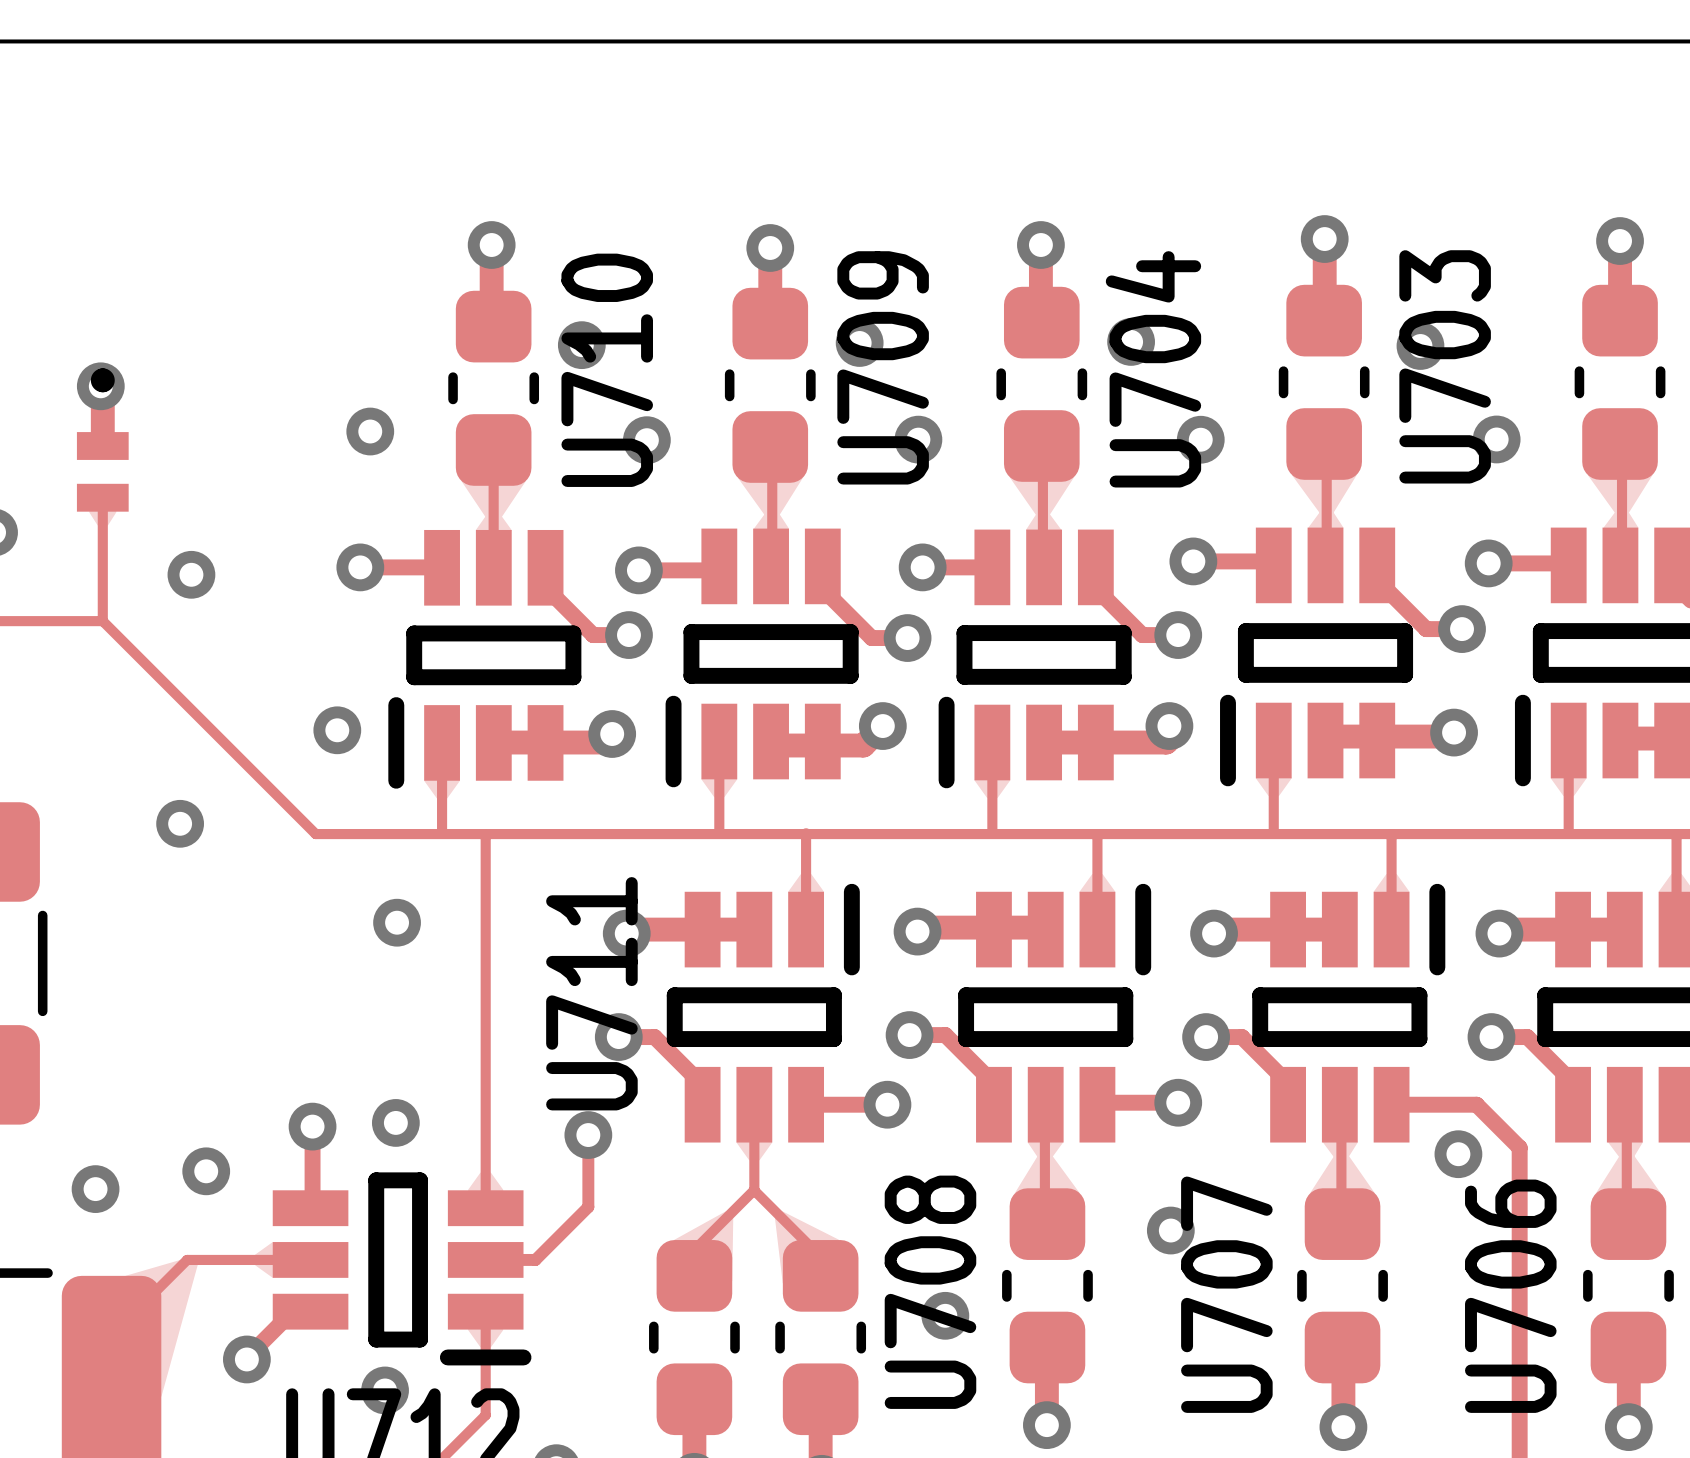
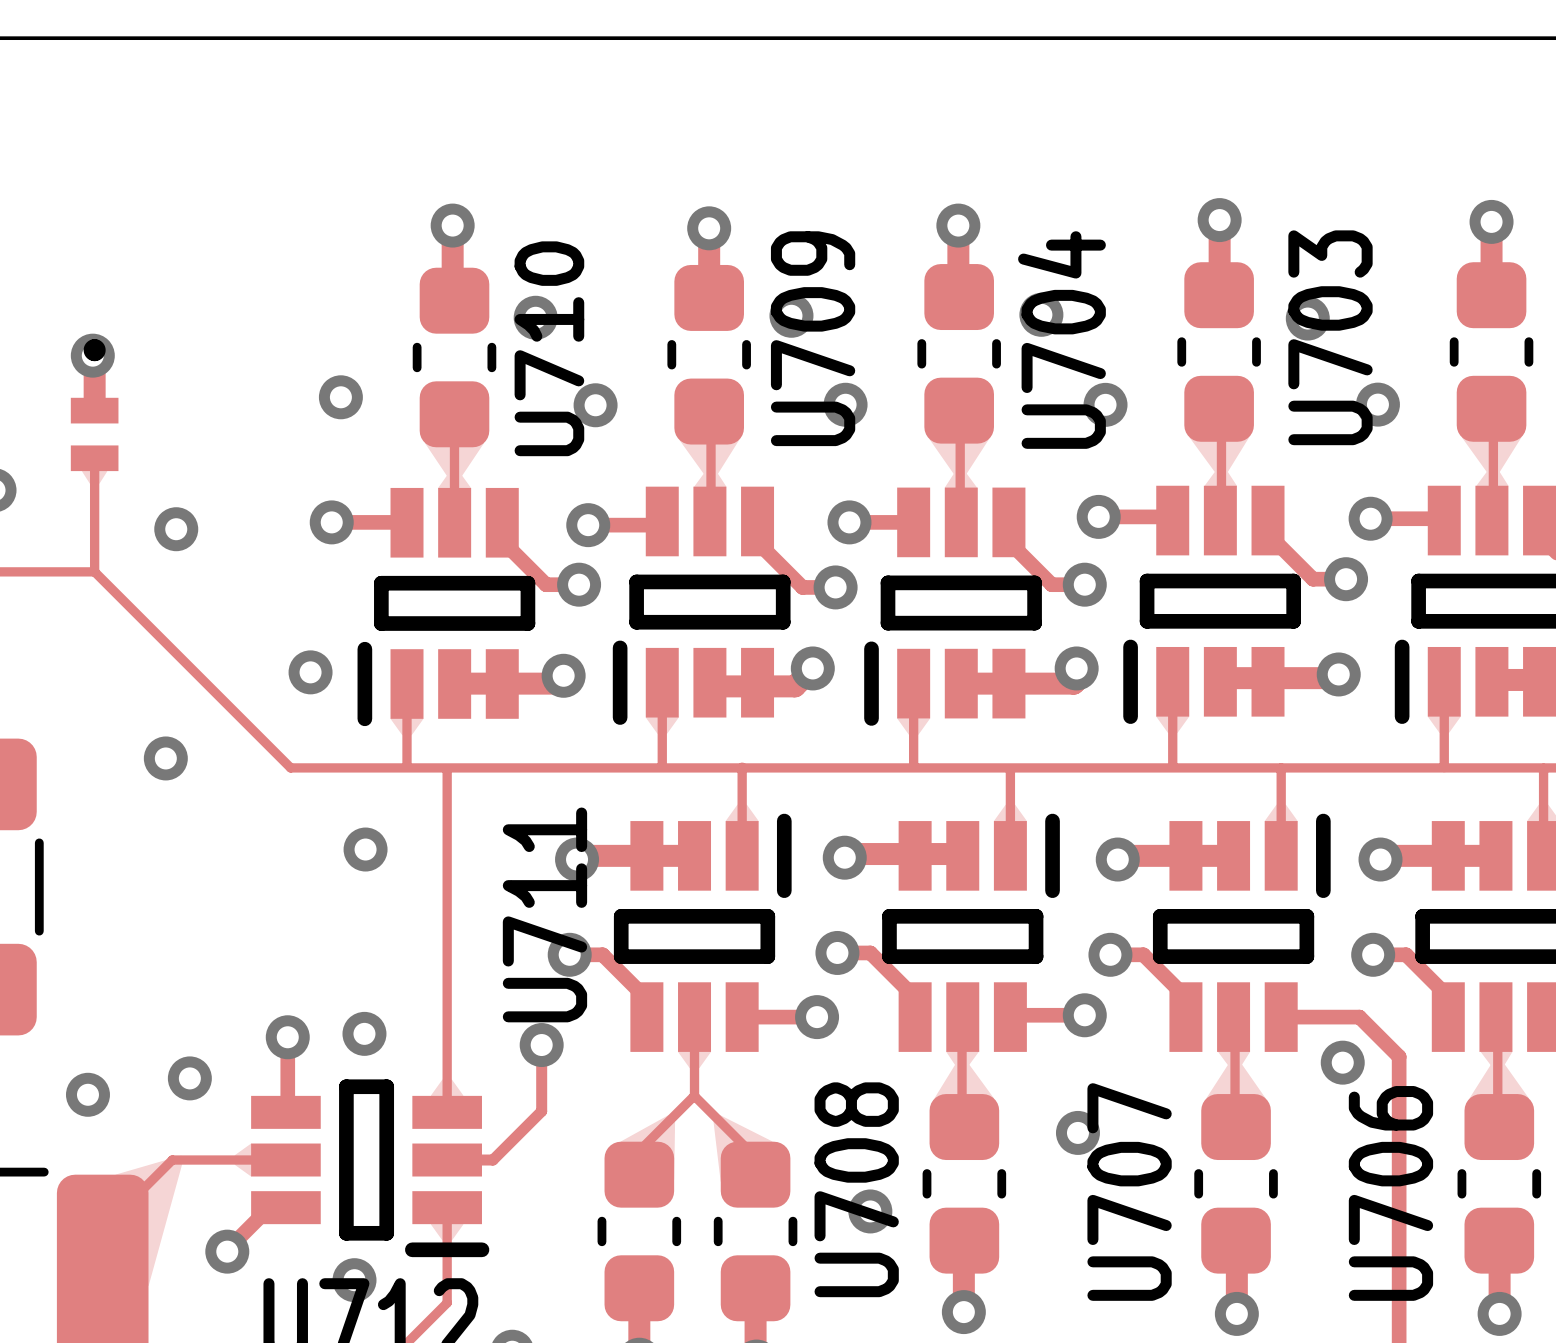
U710 name position: U710 (607, 370) -> U710 (549, 348)

